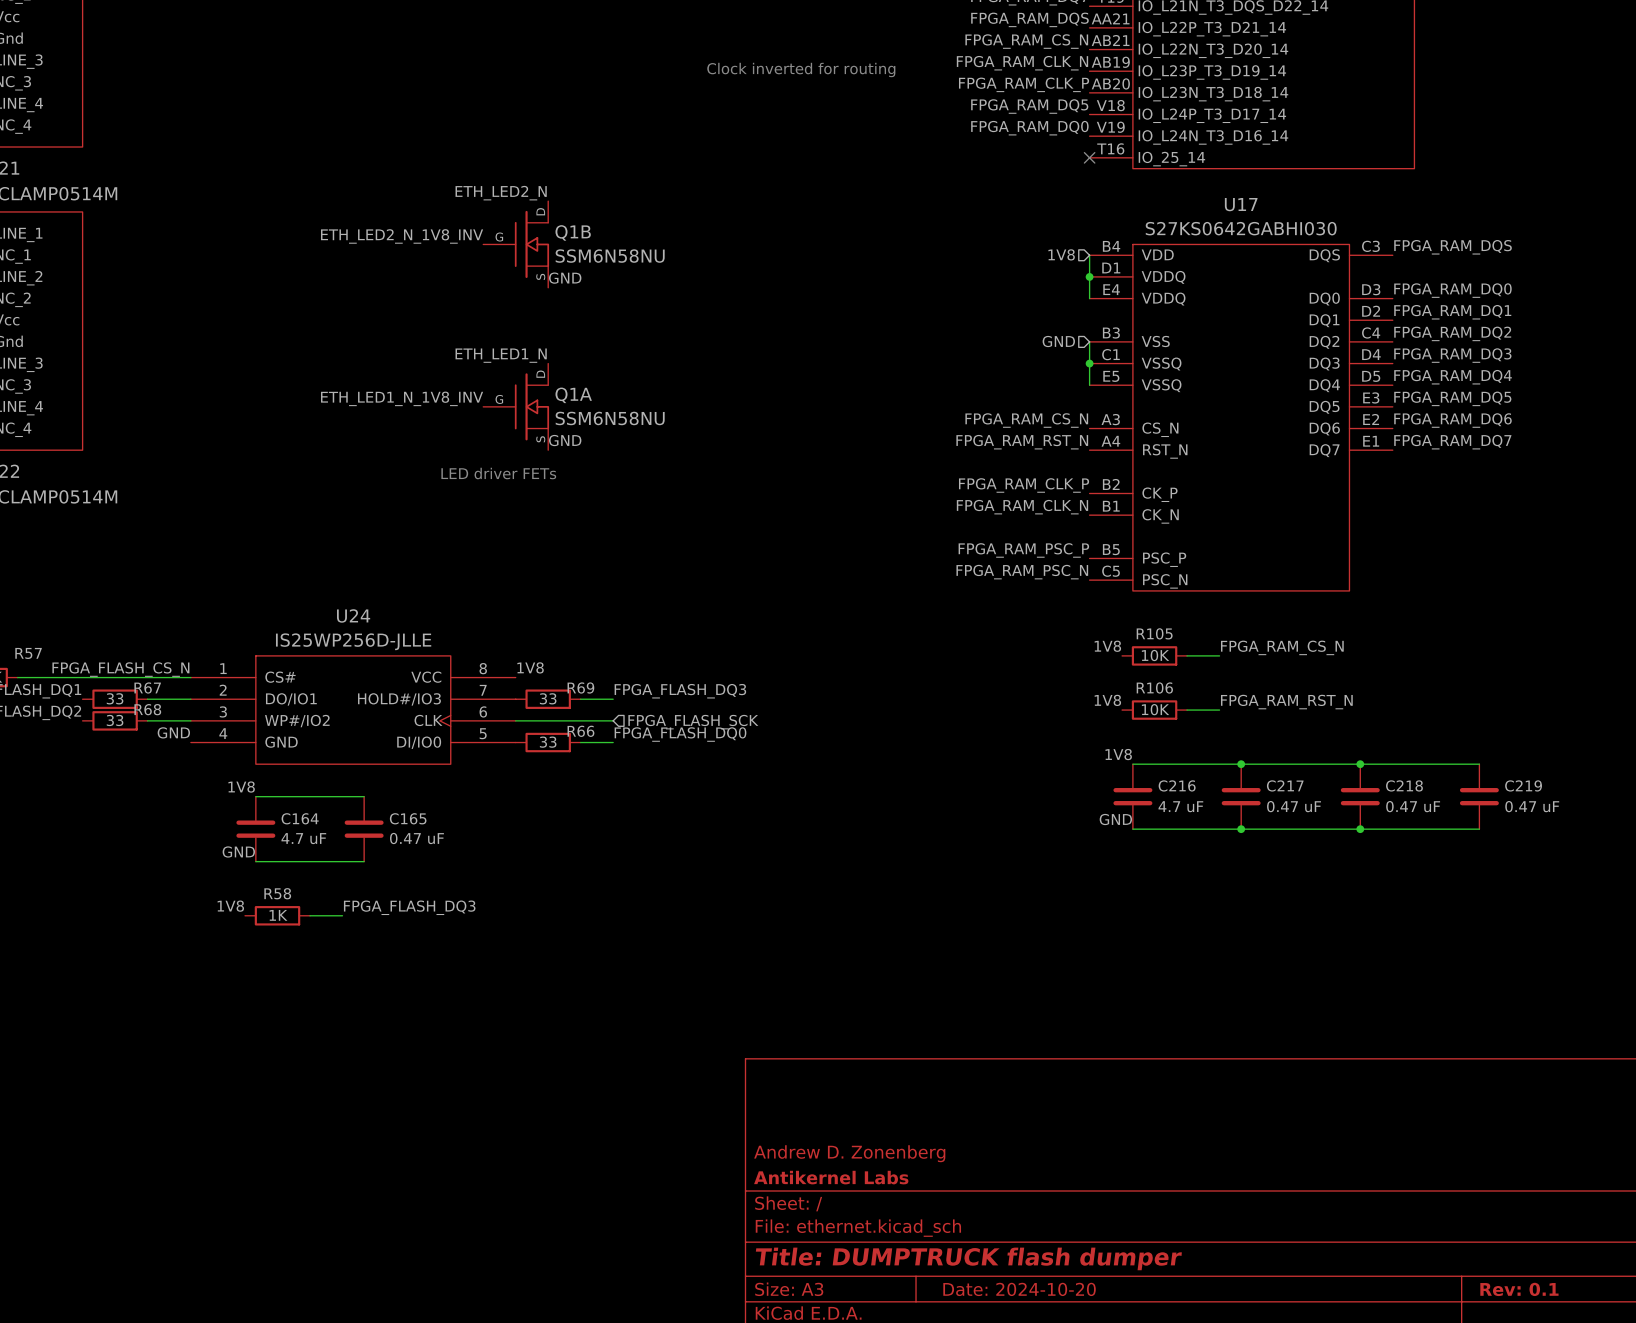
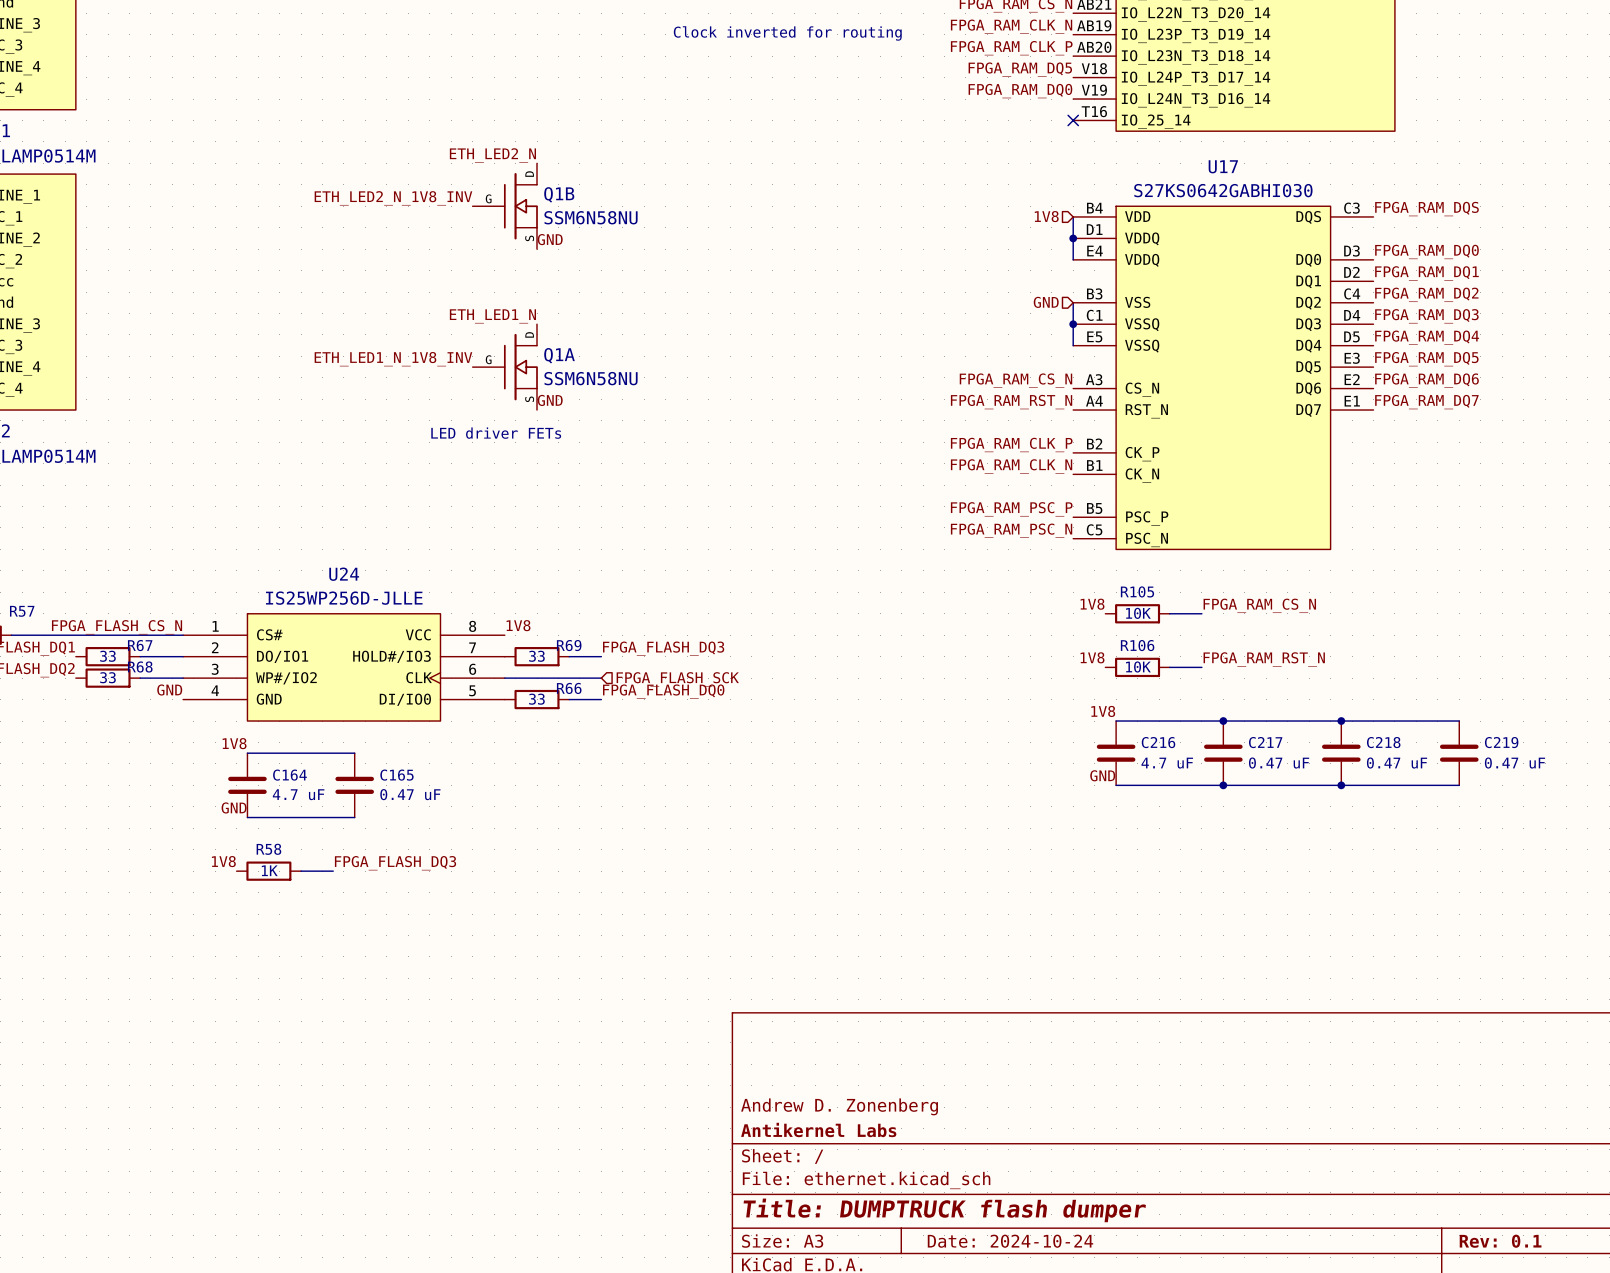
title block: Date: 2024-10-20 (1019, 1289) -> Date: 2024-10-24 (1010, 1241)

